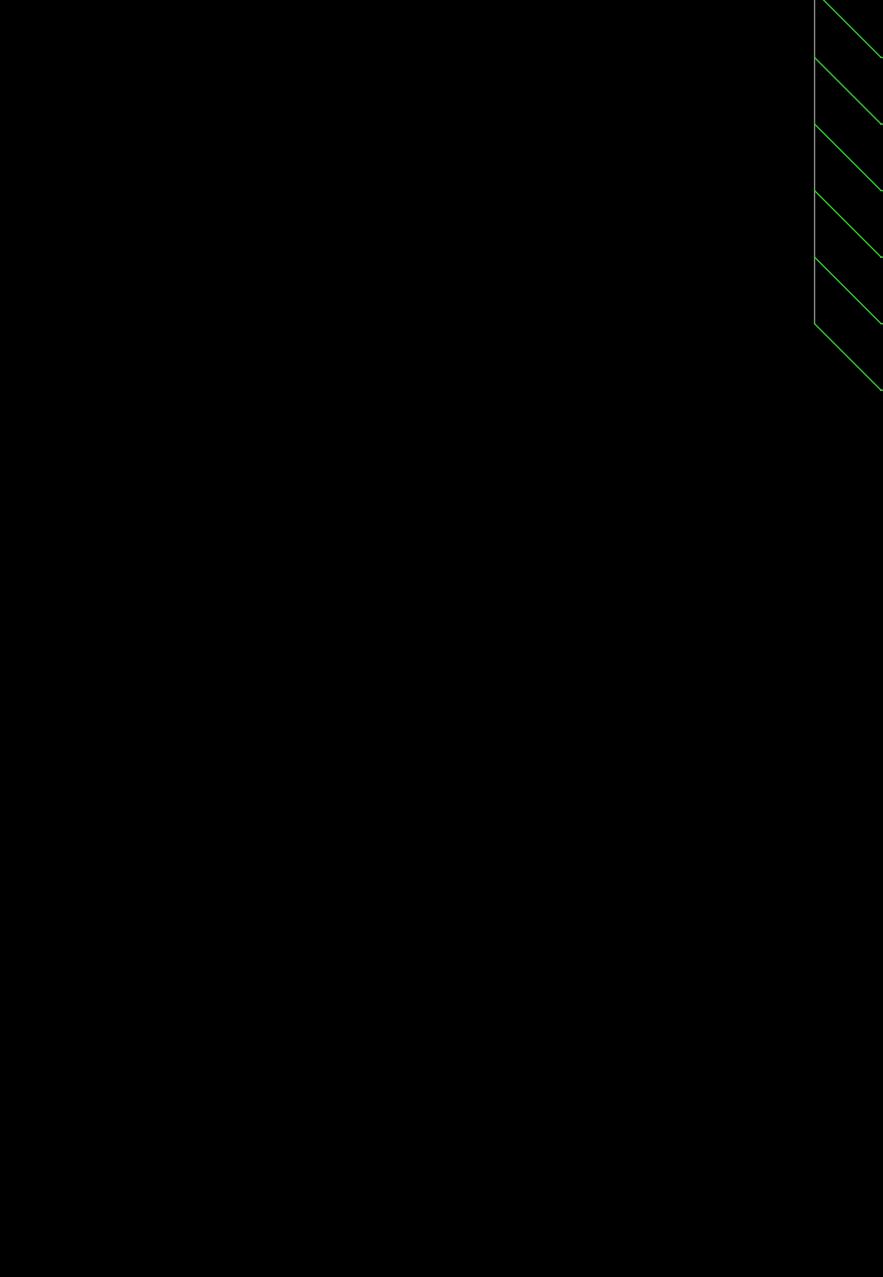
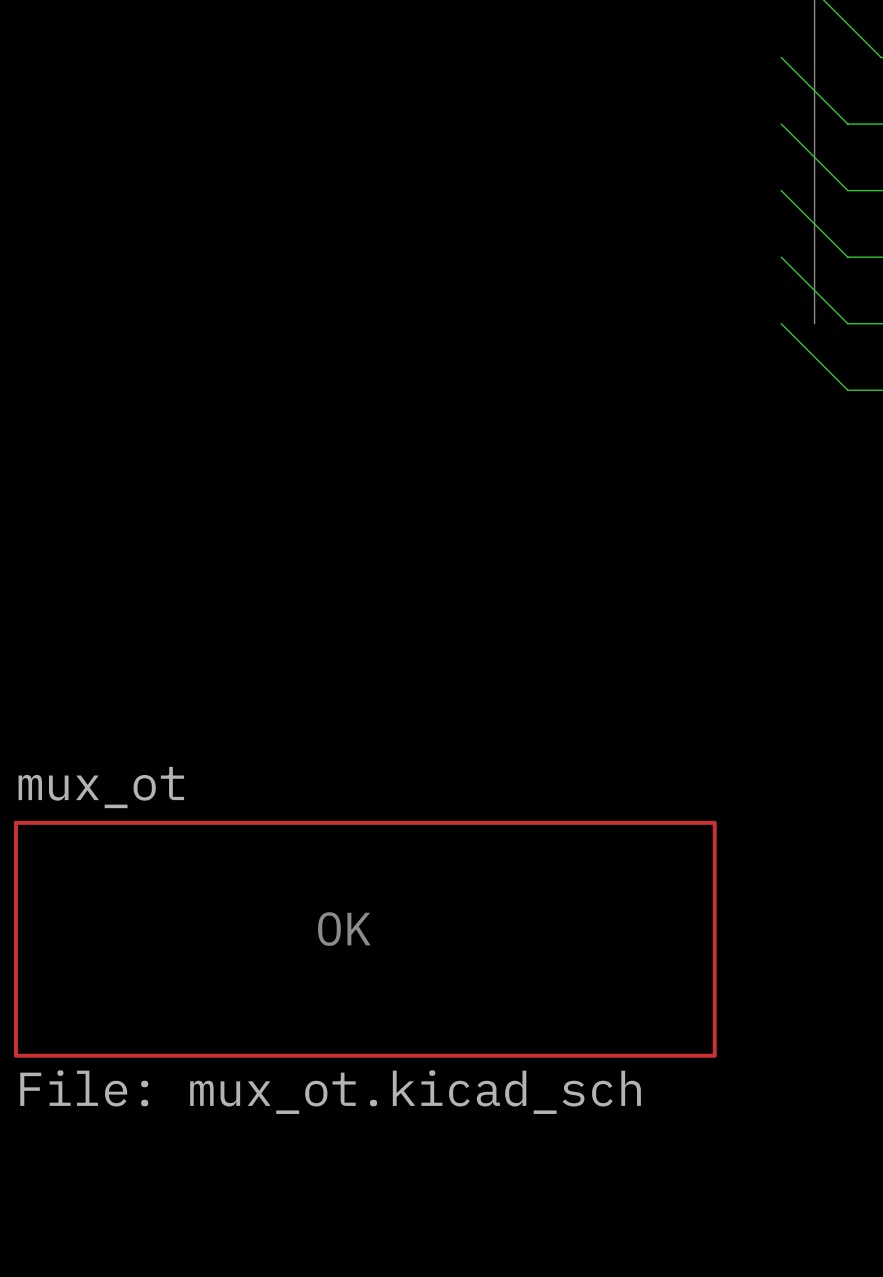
wire: (814, 57) (881, 124) -> (781, 57) (847, 124) (881, 124)
wire: (814, 124) (881, 190) -> (781, 124) (847, 190) (881, 190)
wire: (814, 190) (881, 257) -> (781, 190) (847, 257) (881, 257)
wire: (814, 257) (881, 323) -> (781, 257) (847, 323) (881, 323)
wire: (814, 323) (881, 390) -> (781, 323) (847, 390) (881, 390)
text: none -> OK (344, 929)
sheet mux_ot: none -> File: mux_ot.kicad_sch (365, 939)

